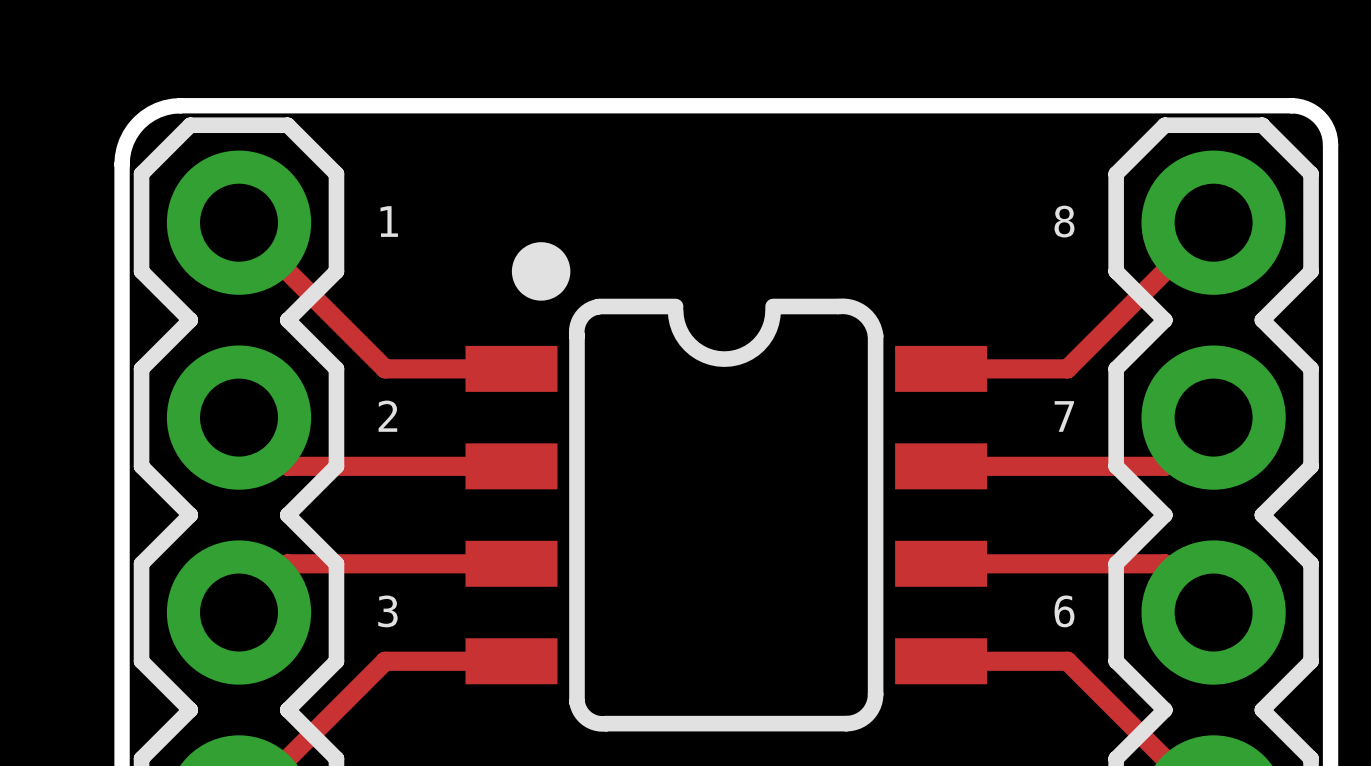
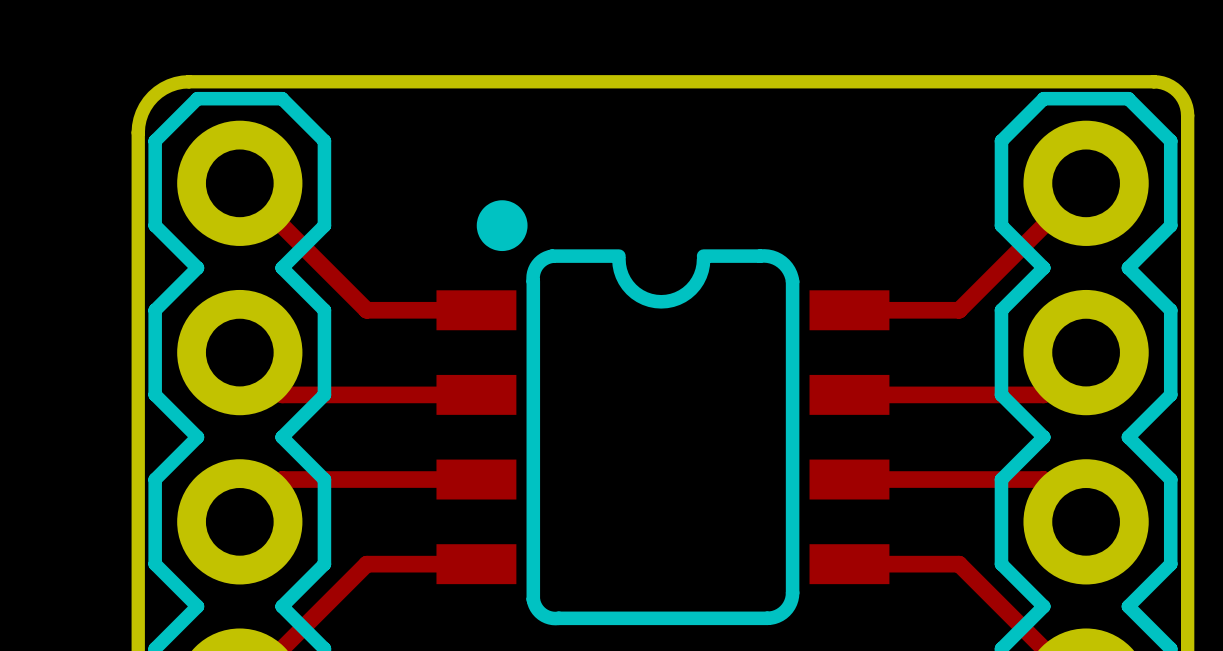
text: 1 (389, 221) -> none
text: 8 (1064, 221) -> none
text: 2 (387, 416) -> none
text: 7 (1064, 416) -> none
text: 3 (387, 611) -> none
text: 6 (1064, 611) -> none

